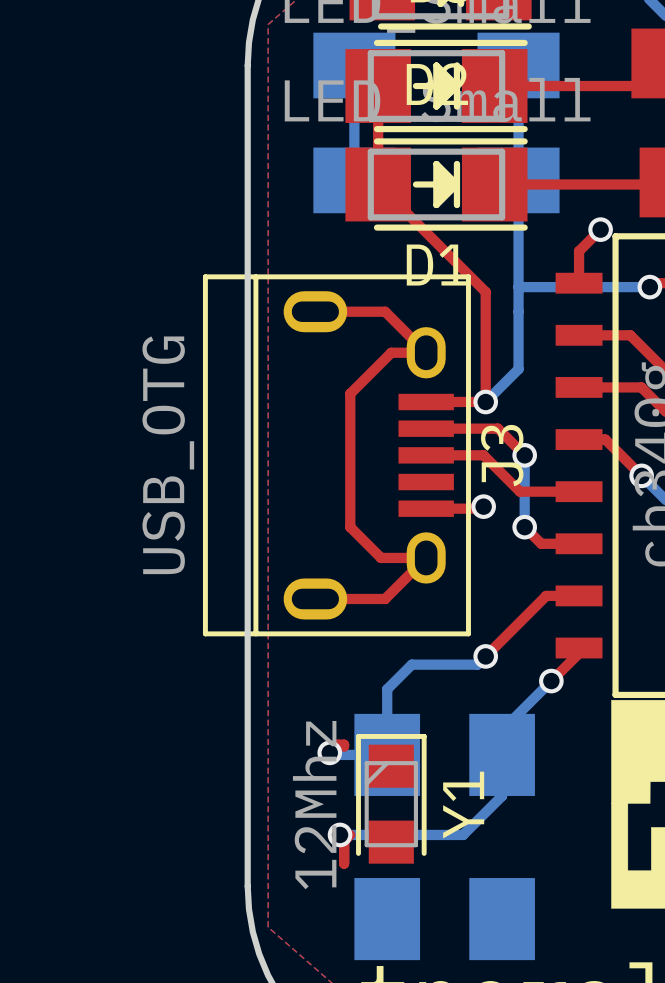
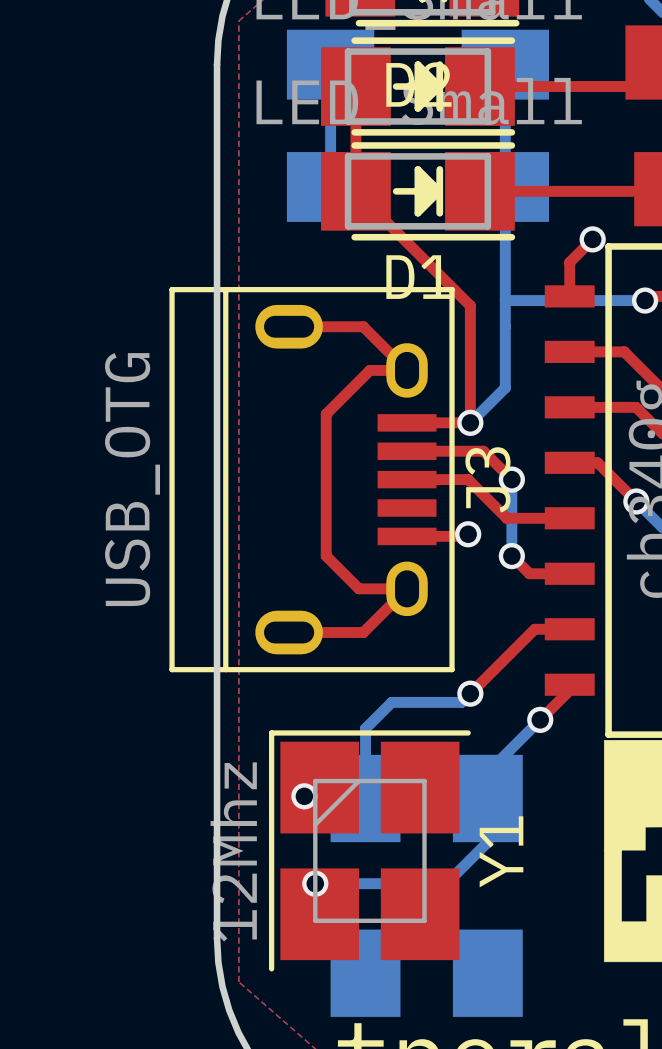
Y1 footprint: [356, 734, 427, 864] -> [269, 730, 471, 972]

